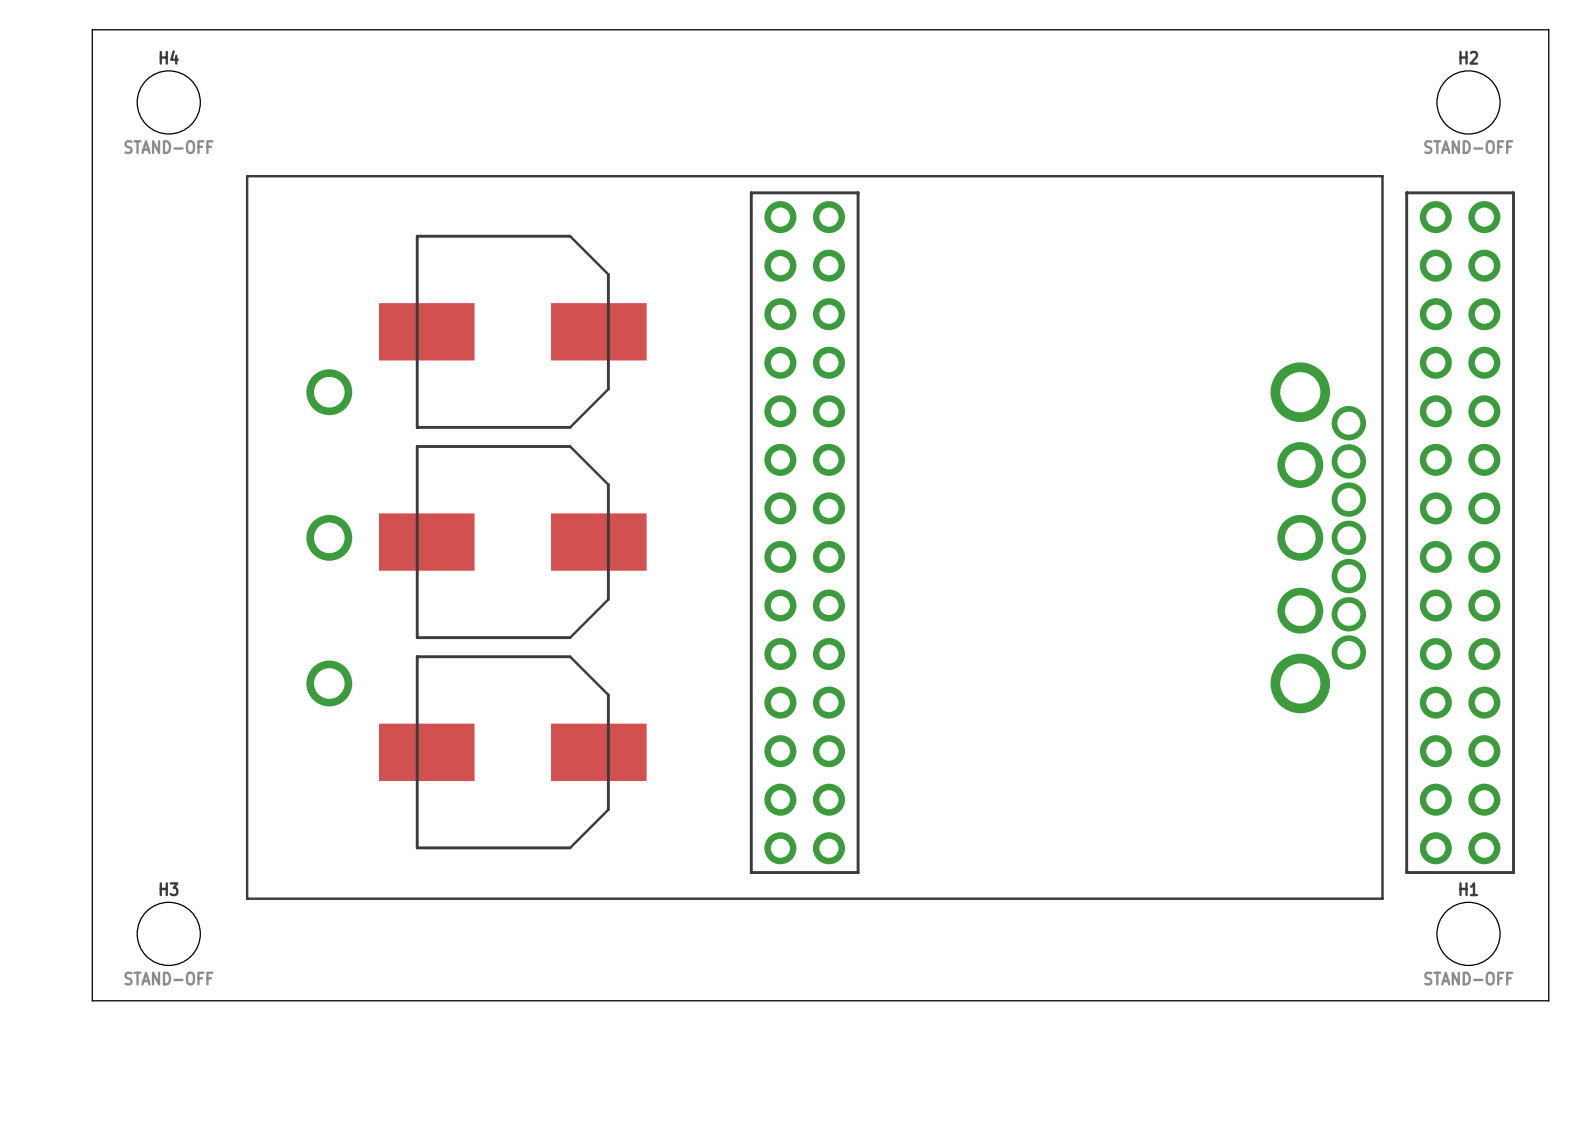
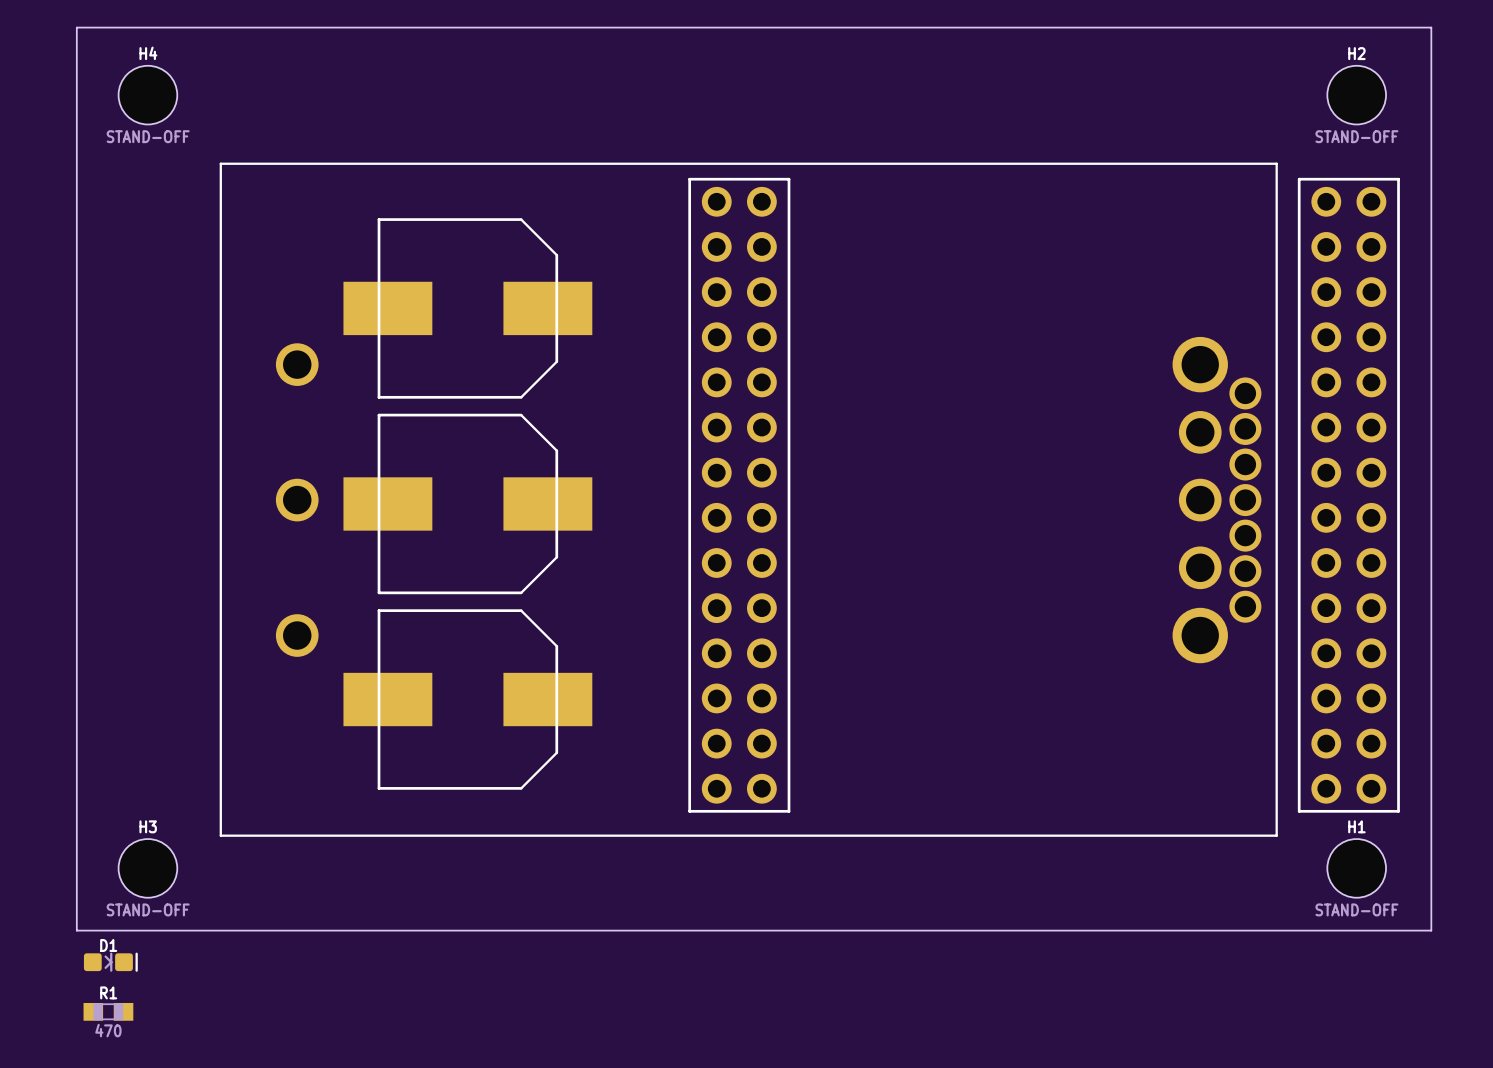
D1: none -> (110, 962)
R1: none -> 470 (108, 1011)

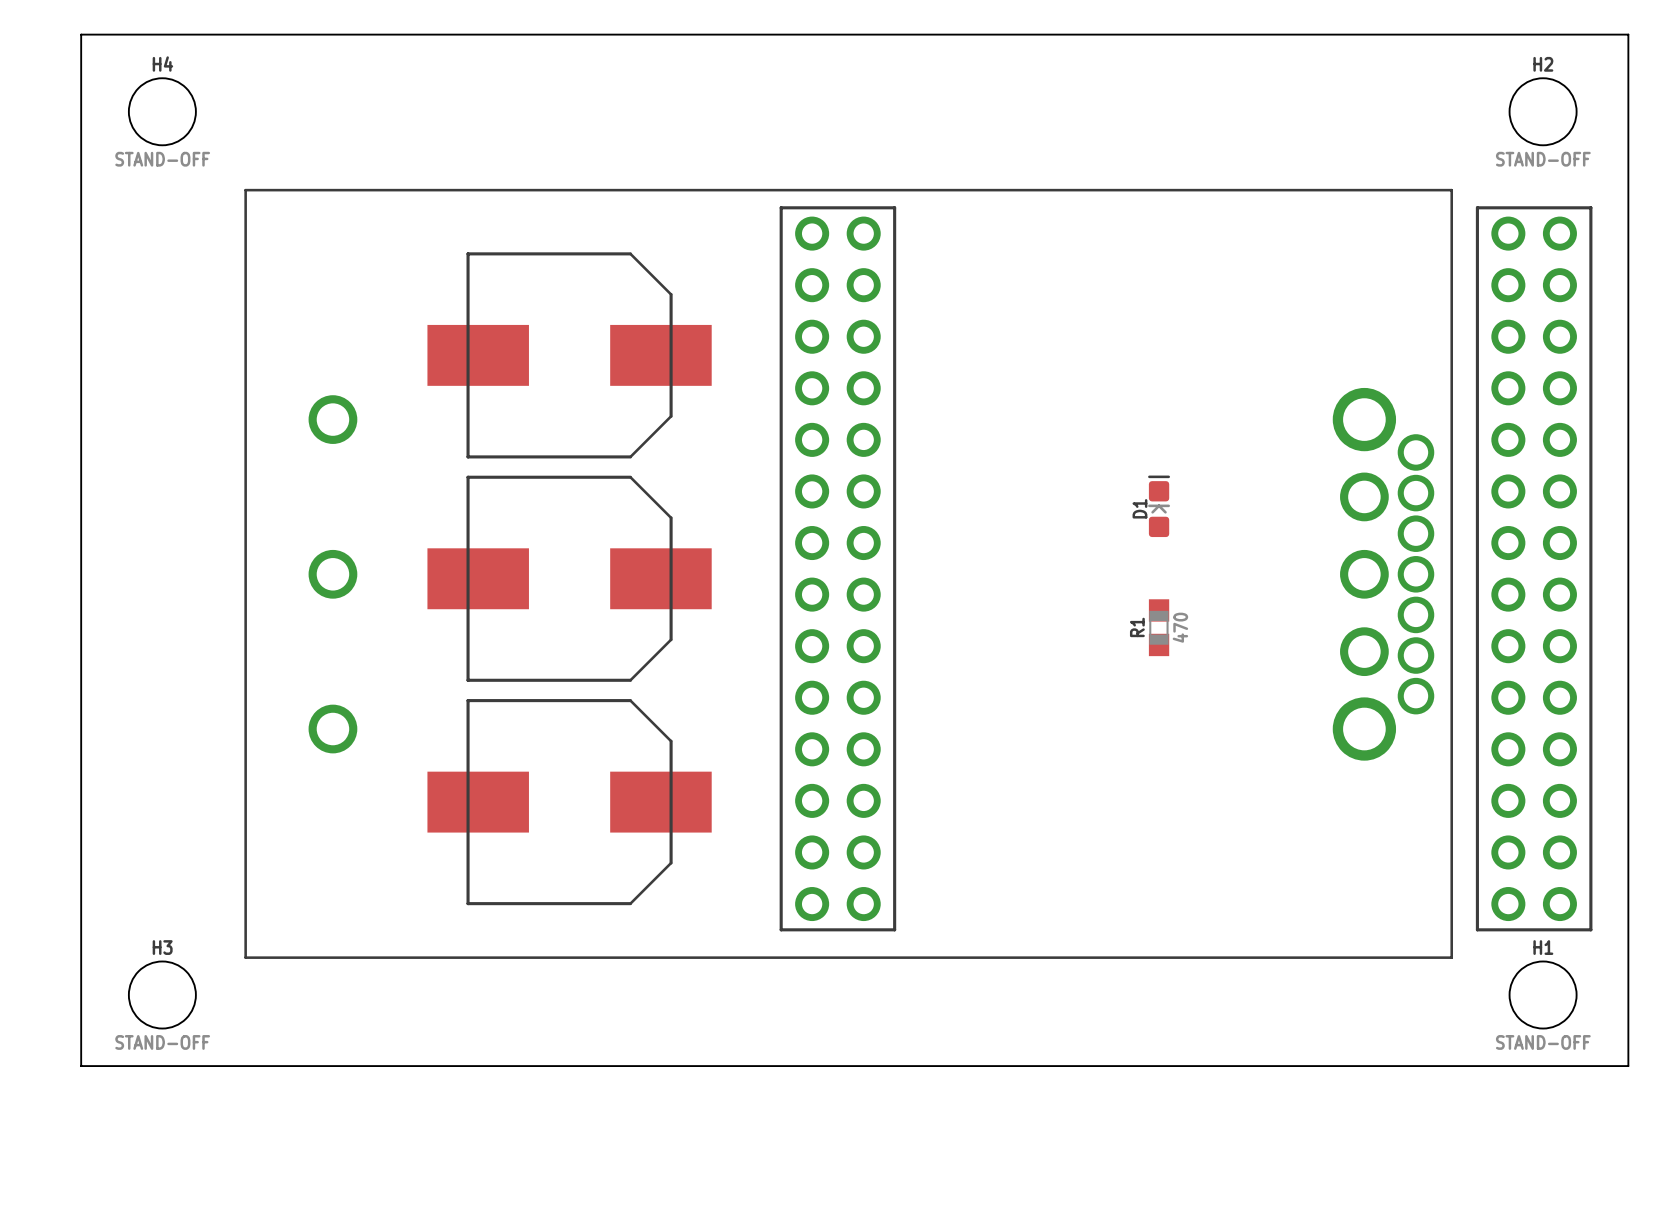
part position: (467, 308) -> (569, 355)
part position: (467, 503) -> (569, 578)
part position: (467, 699) -> (569, 802)
D1 rotation: 0° (110, 962) -> 90° counterclockwise (1159, 506)
D1 position: (110, 962) -> (1159, 506)
R1 rotation: 0° (108, 1011) -> 90° clockwise (1159, 627)
R1 position: (108, 1011) -> (1159, 627)

